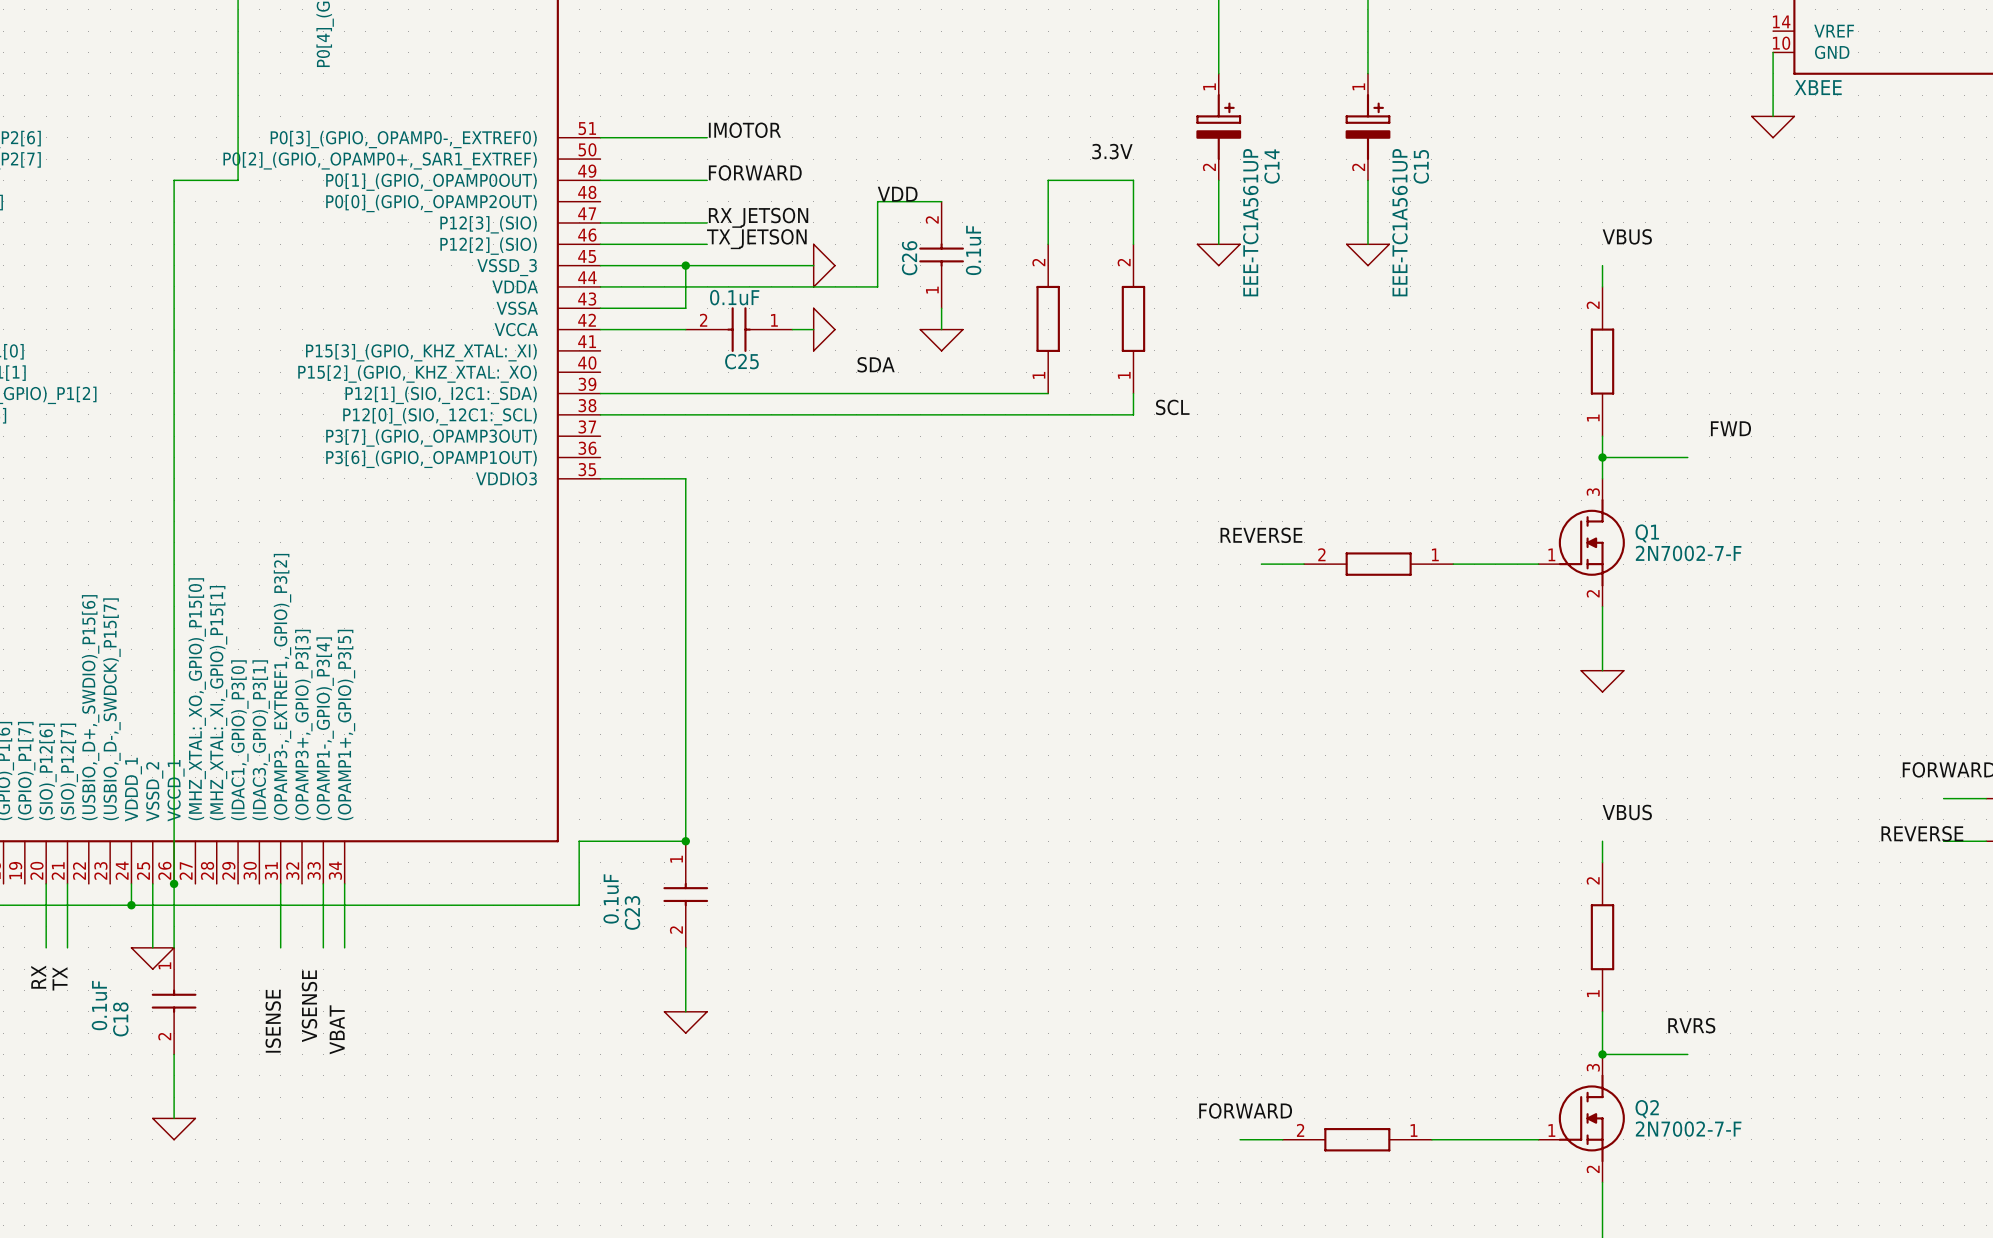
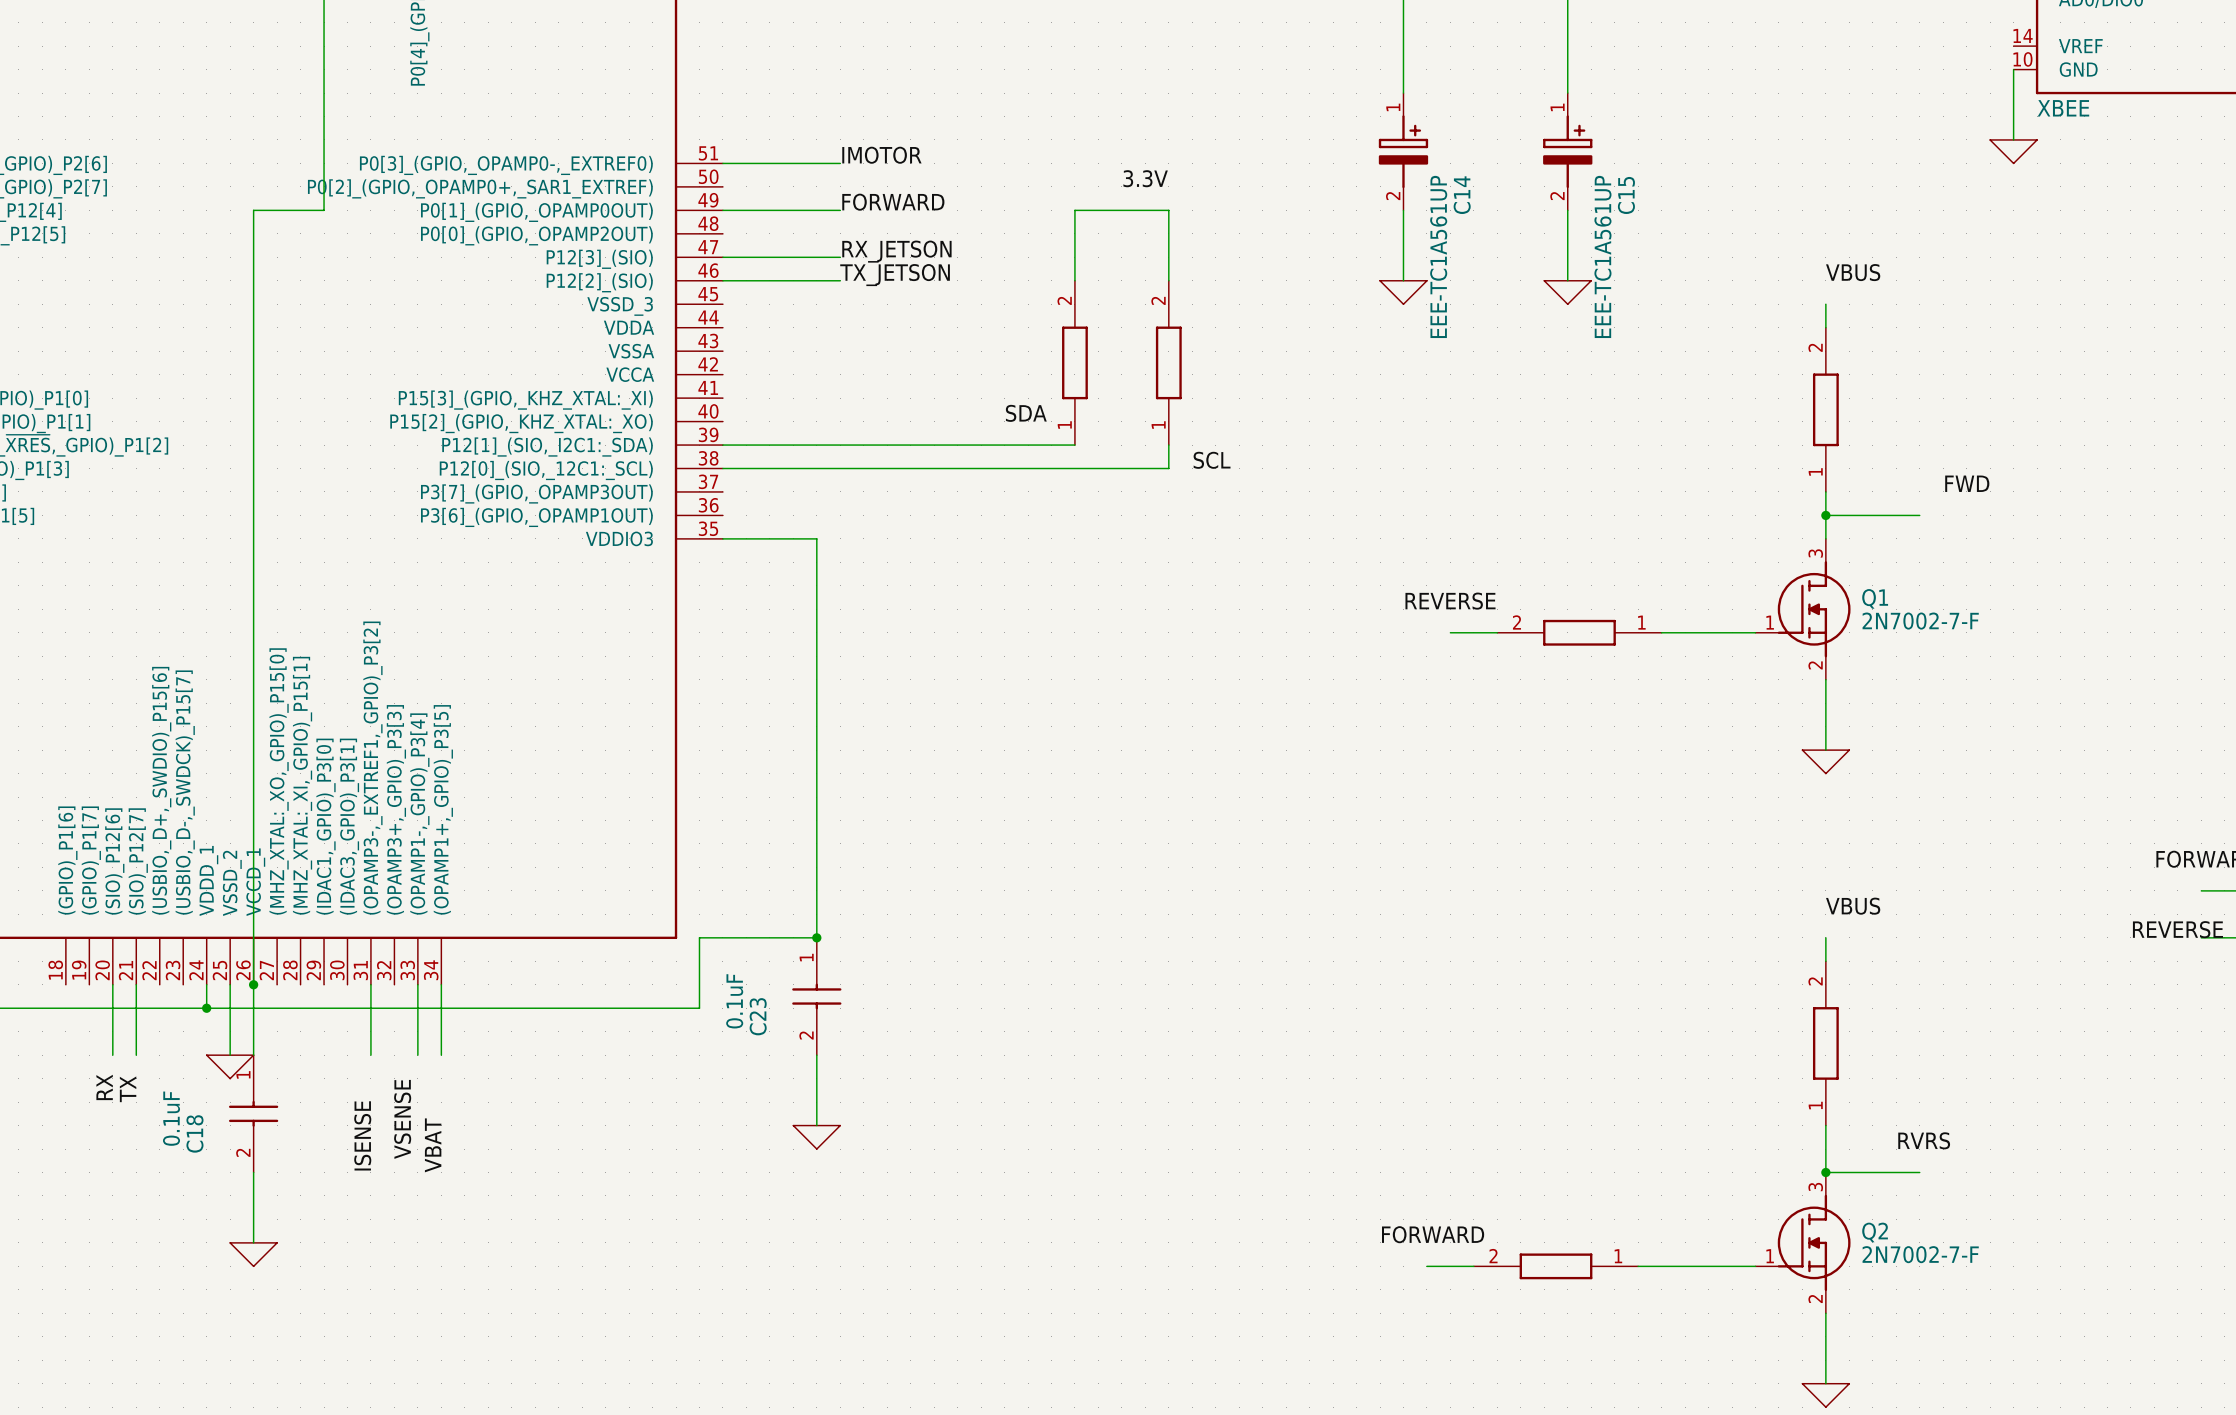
label position: 3.3V (1112, 151) -> 3.3V (1145, 178)
label: VDD (897, 194) -> none
wire: (941, 201) (877, 201) (877, 286) (600, 286) -> none
wire: (1048, 244) (1048, 180) (1133, 180) (1133, 244) -> (1074, 280) (1074, 210) (1168, 210) (1168, 280)
C26: 0.1uF (941, 254) -> none
wire: (600, 265) (813, 265) -> none
wire: (685, 265) (685, 308) (600, 308) -> none
junction: (685, 265) -> none
power symbol: (824, 265) -> none
wire: (941, 308) (941, 329) -> none
part: none -> (1074, 362)
part position: (1048, 318) -> (1168, 362)
part: (1133, 318) -> none
wire: (600, 329) (685, 329) -> none
C25: 0.1uF (739, 329) -> none
wire: (792, 329) (813, 329) -> none
power symbol: (824, 329) -> none
power symbol: (941, 340) -> none
wire: (920, 393) (1048, 393) -> none
wire: (1133, 393) (1133, 414) (1005, 414) -> (1168, 445) (1168, 468)
label position: SCL (1172, 407) -> SCL (1212, 460)

